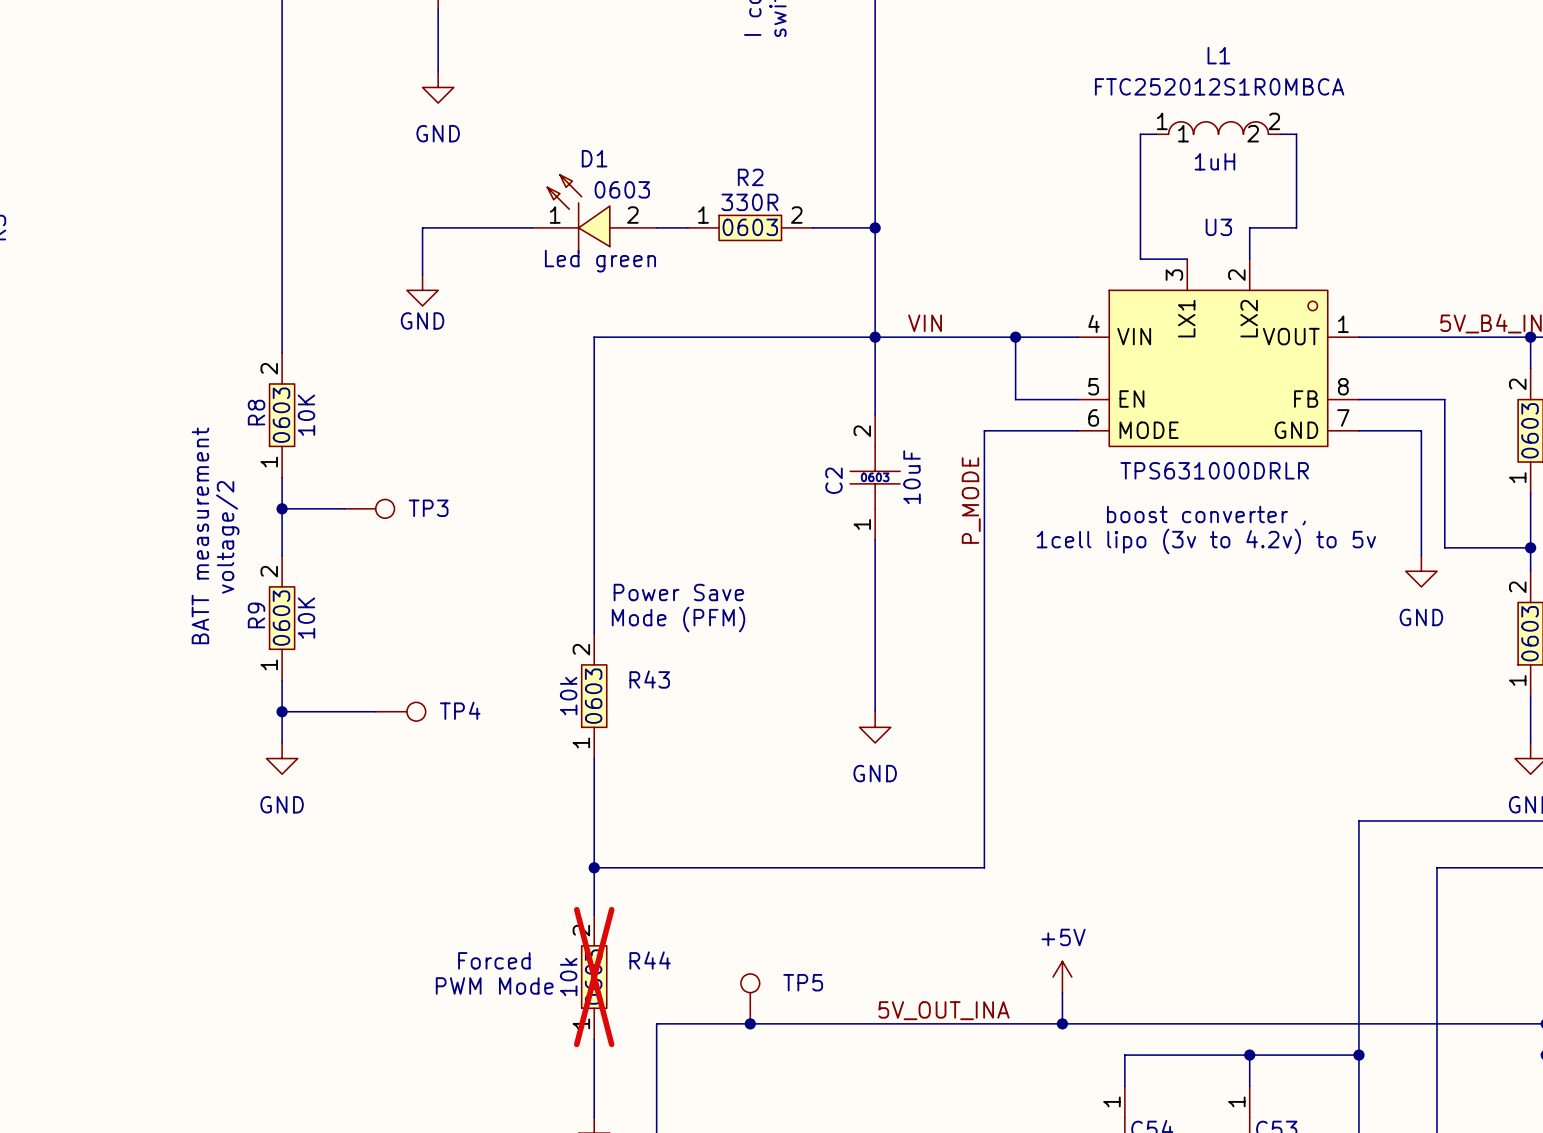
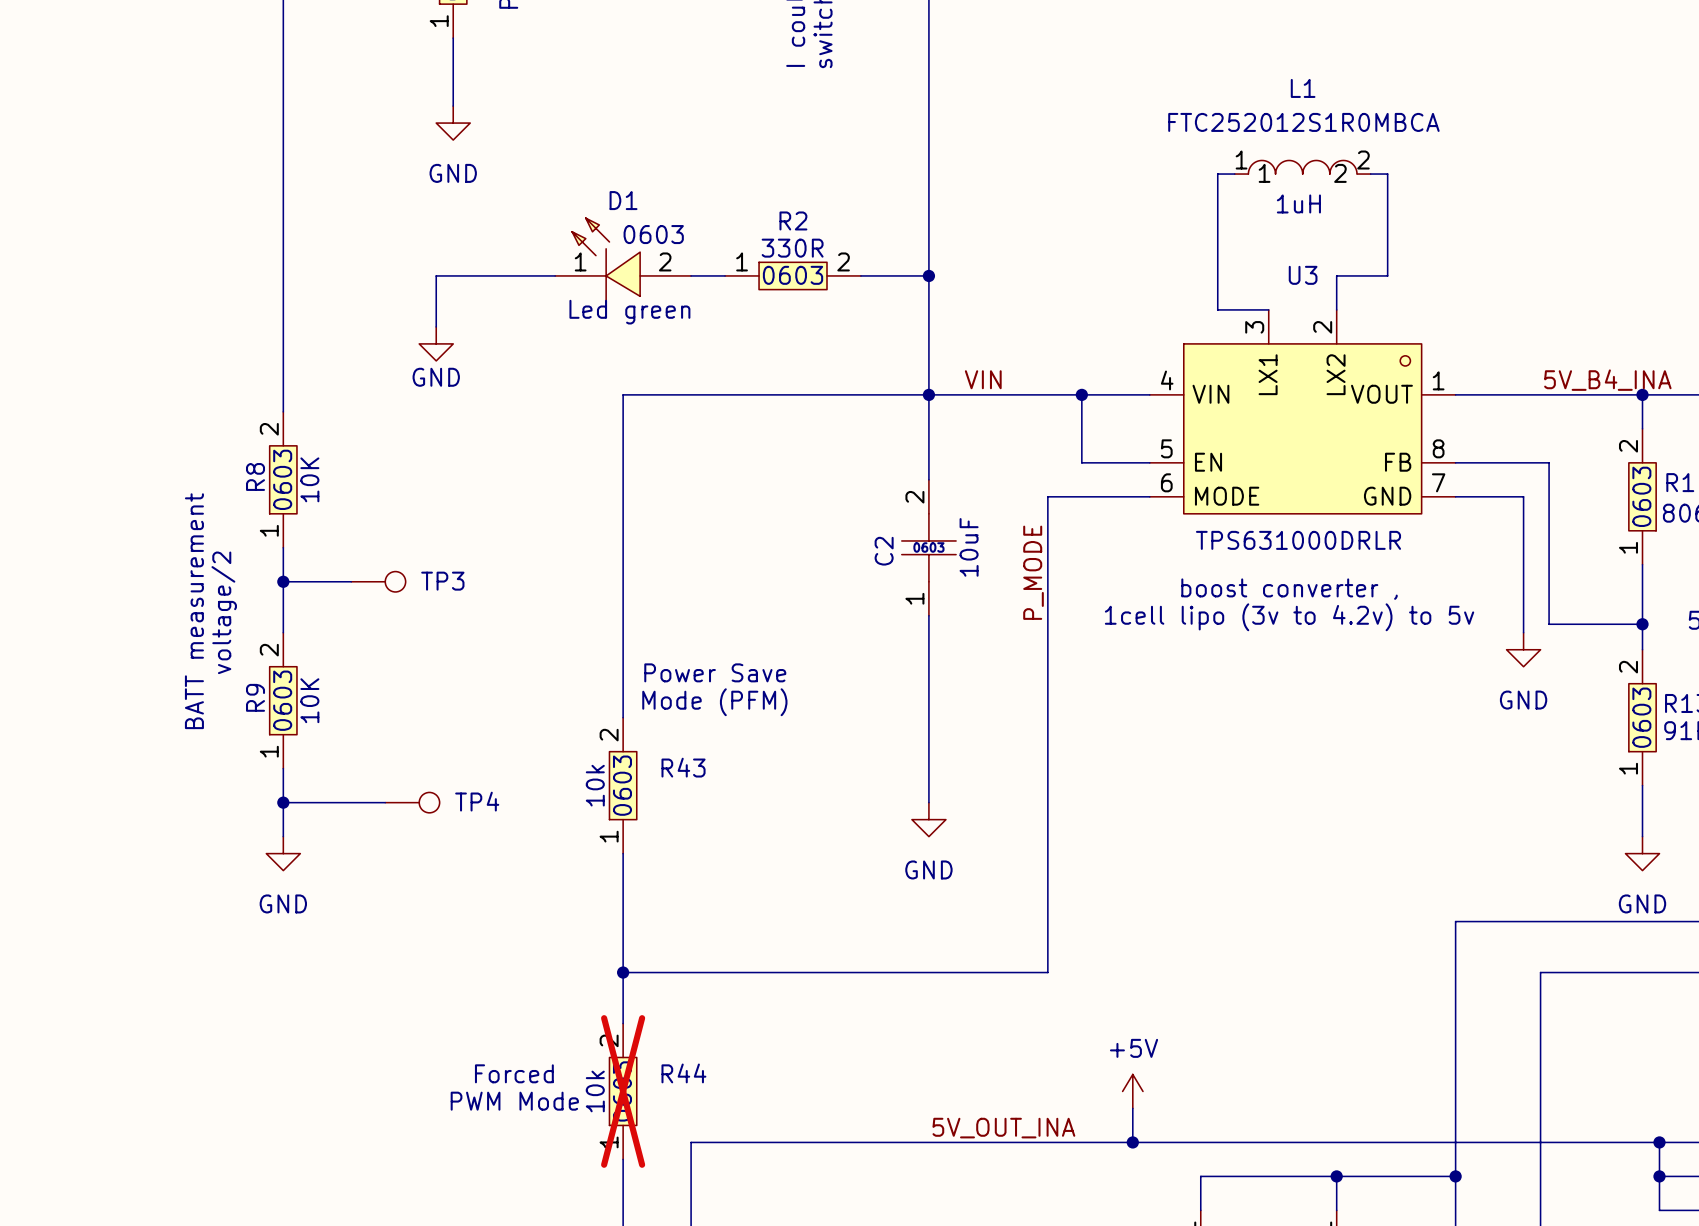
TP5: (750, 998) -> none
junction: (750, 1023) -> none

